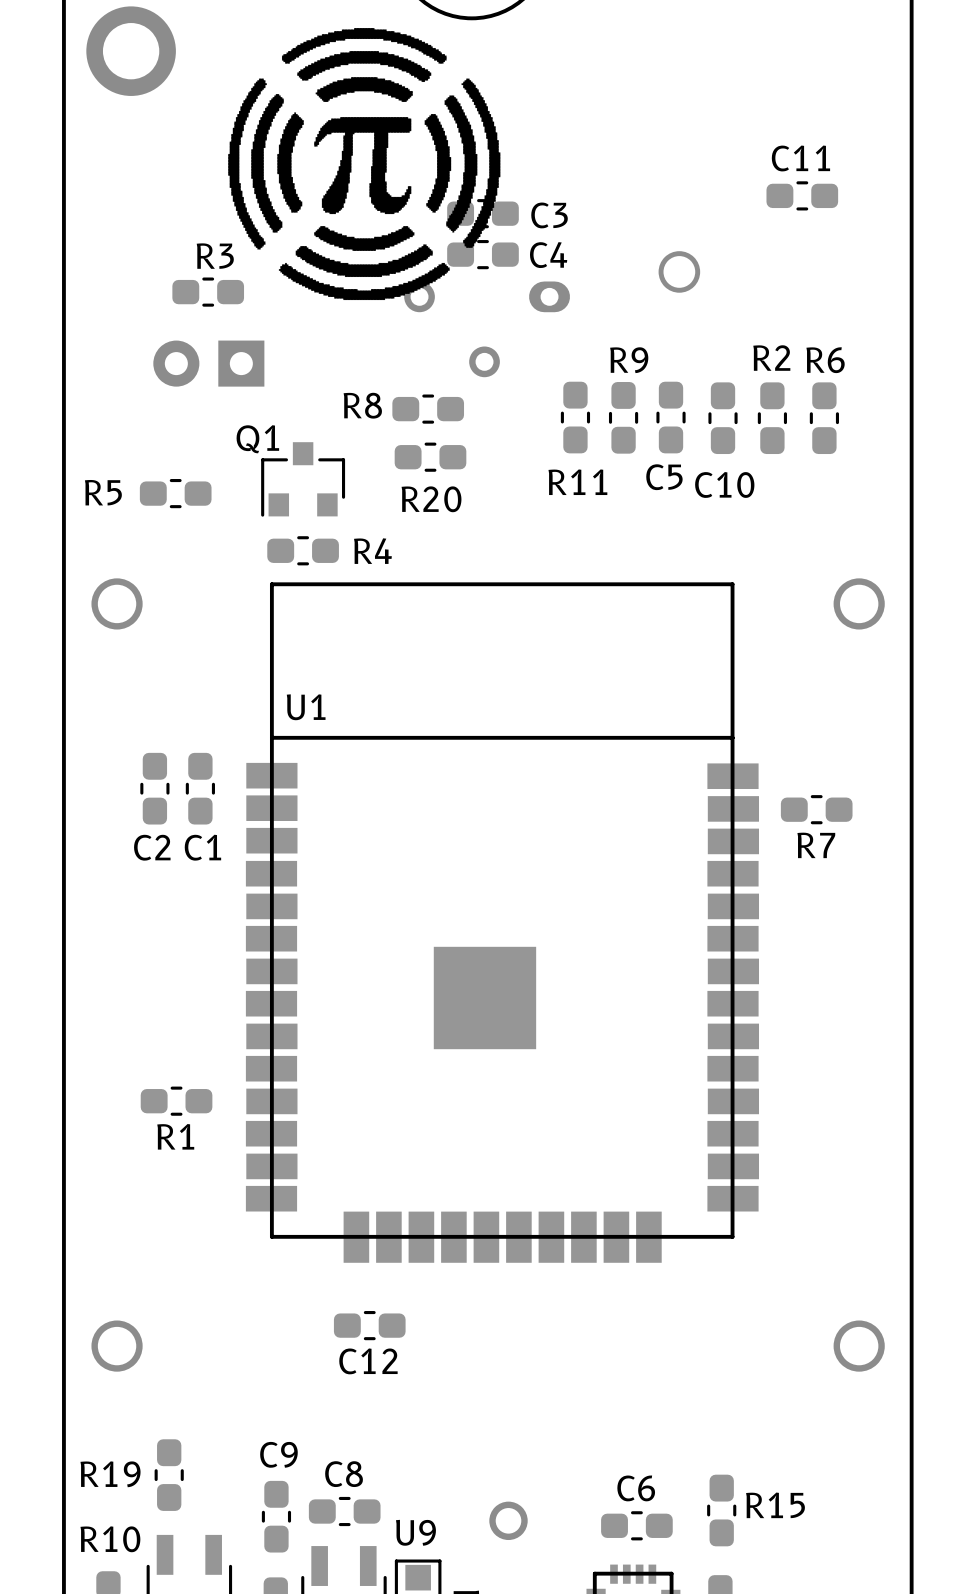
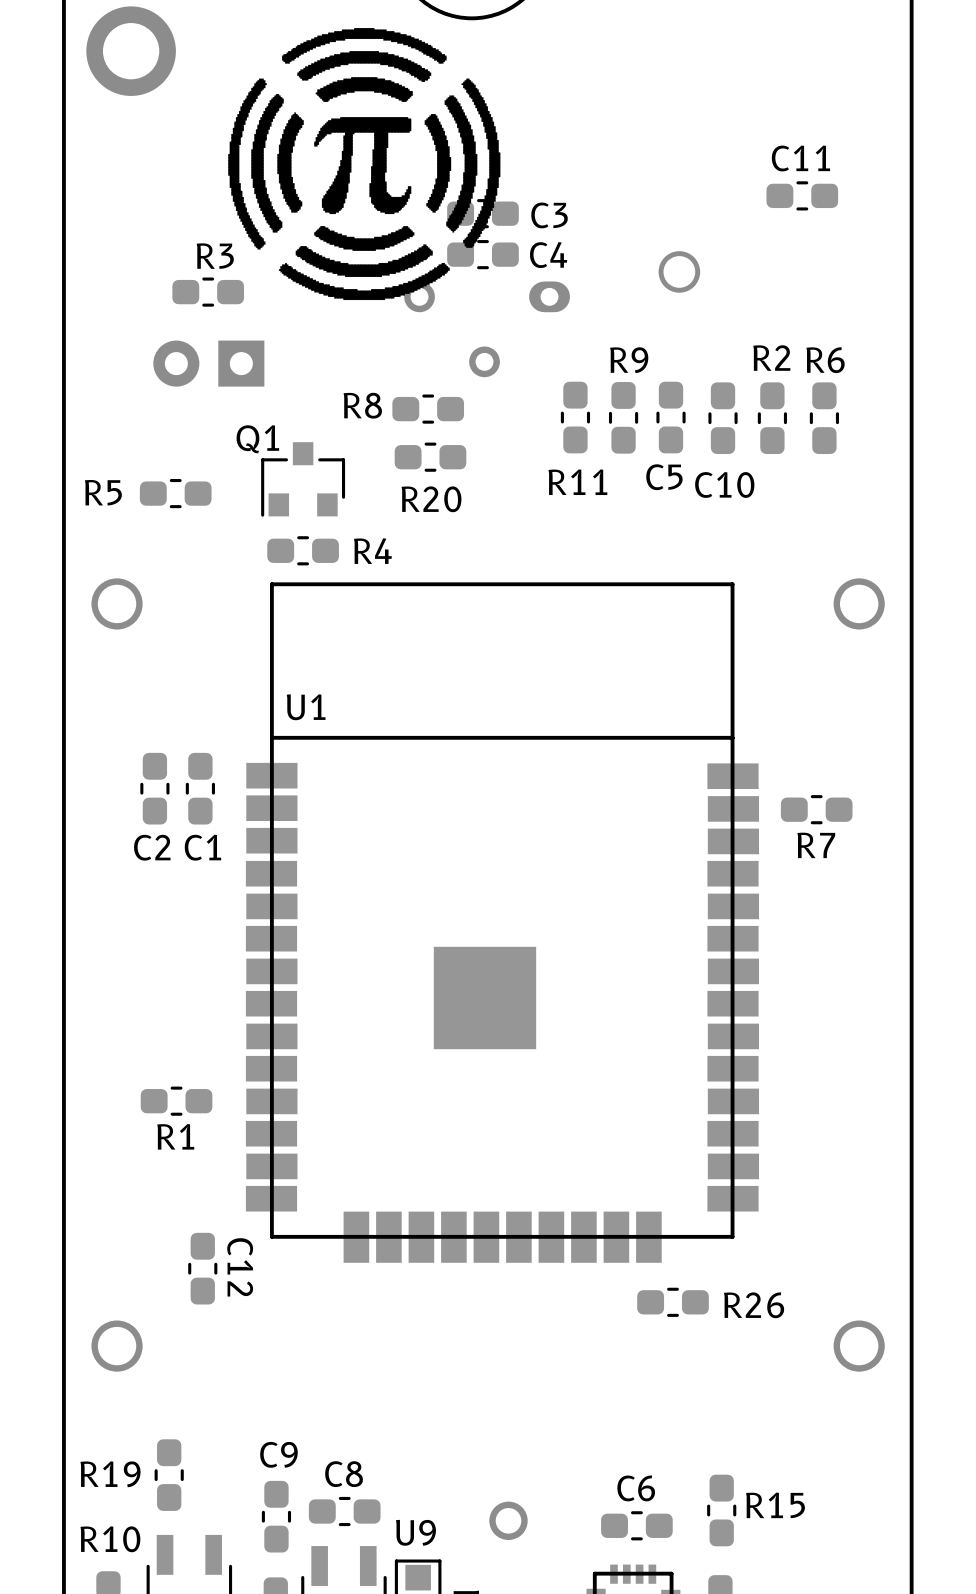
R26: none -> (673, 1302)
C12 rotation: 0° (369, 1325) -> 90° clockwise (202, 1268)
C12 position: (369, 1325) -> (202, 1268)
C12 name position: C12 (368, 1361) -> C12 (240, 1267)

